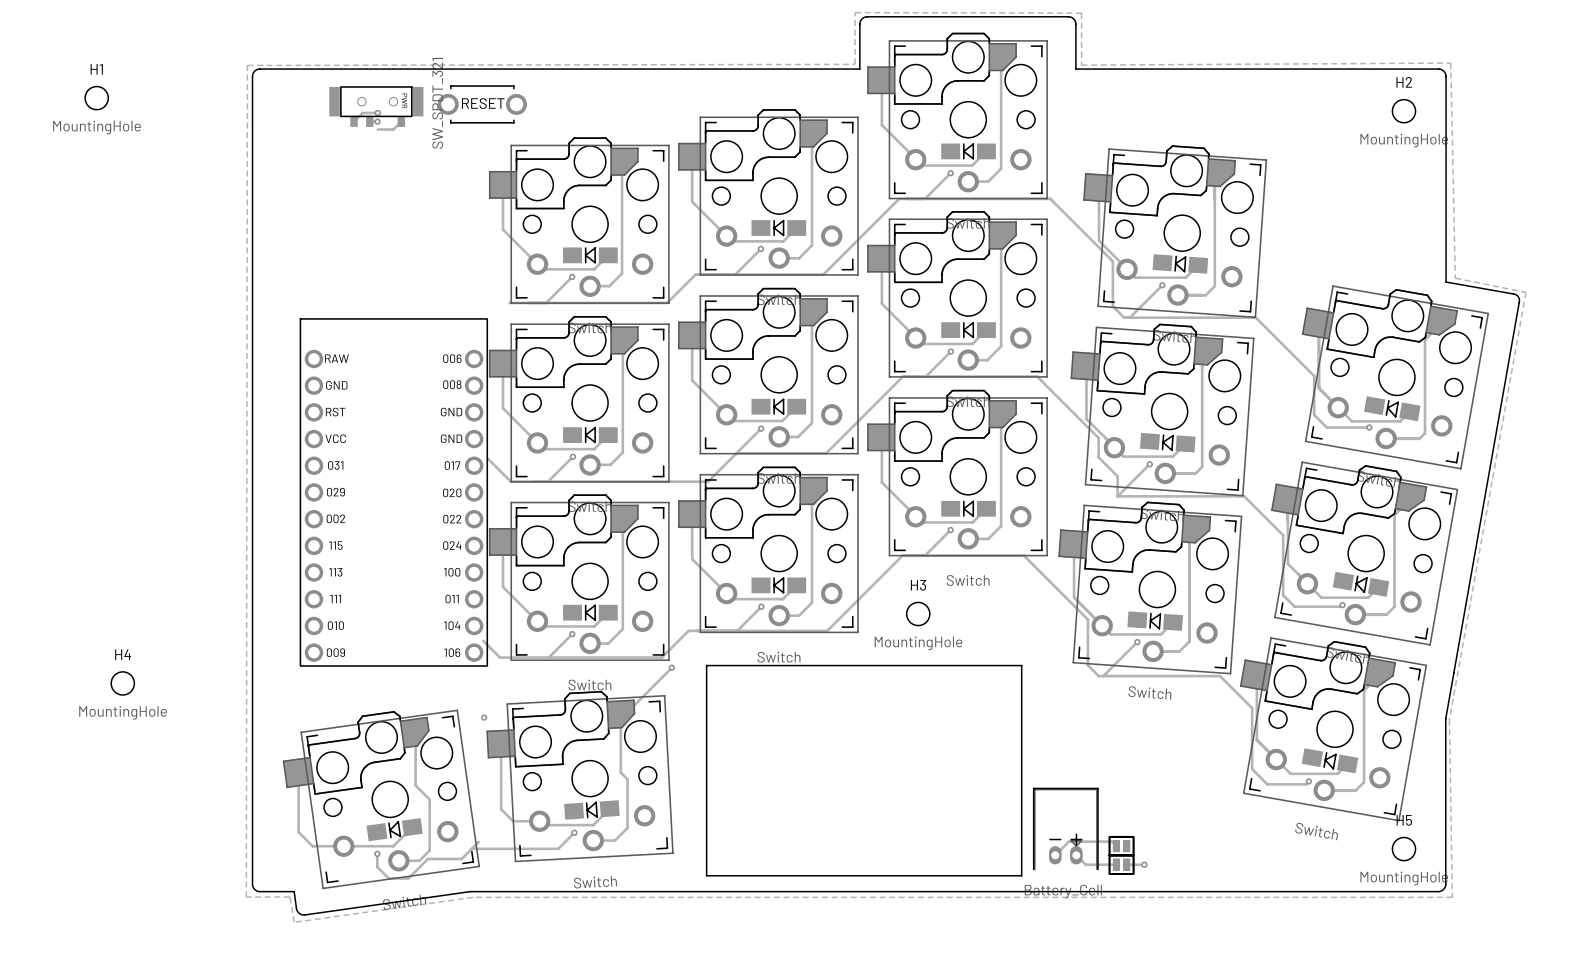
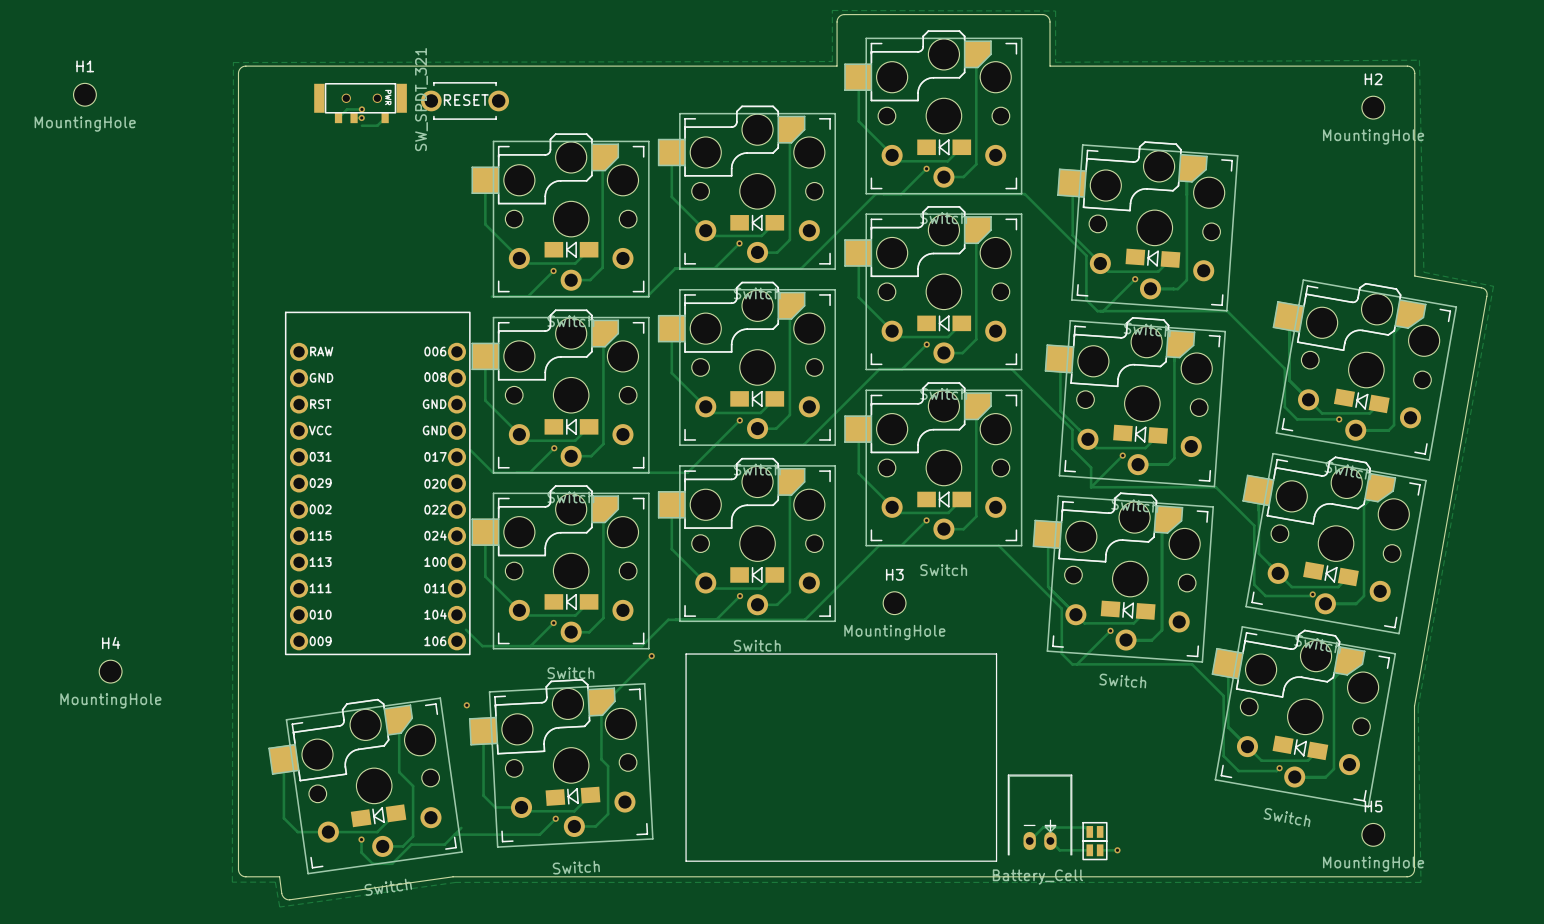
part: (1121, 846) -> none
part: (1121, 864) -> none

